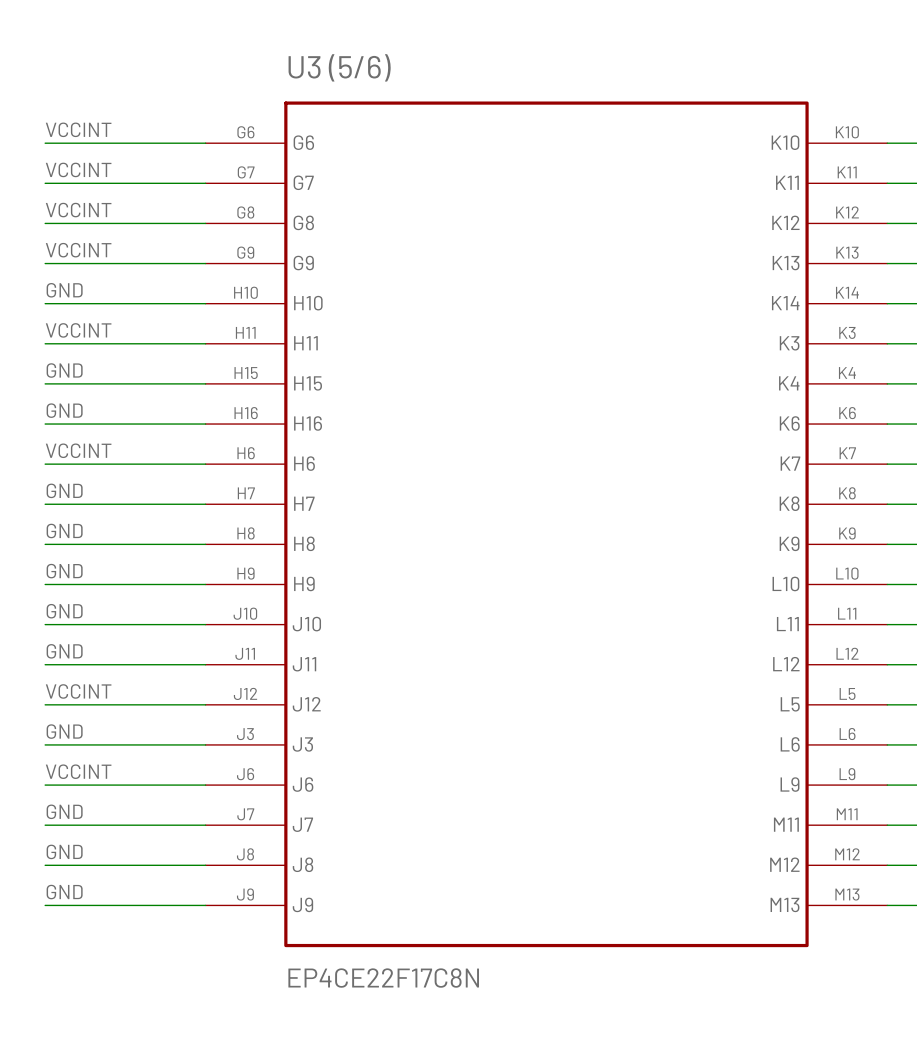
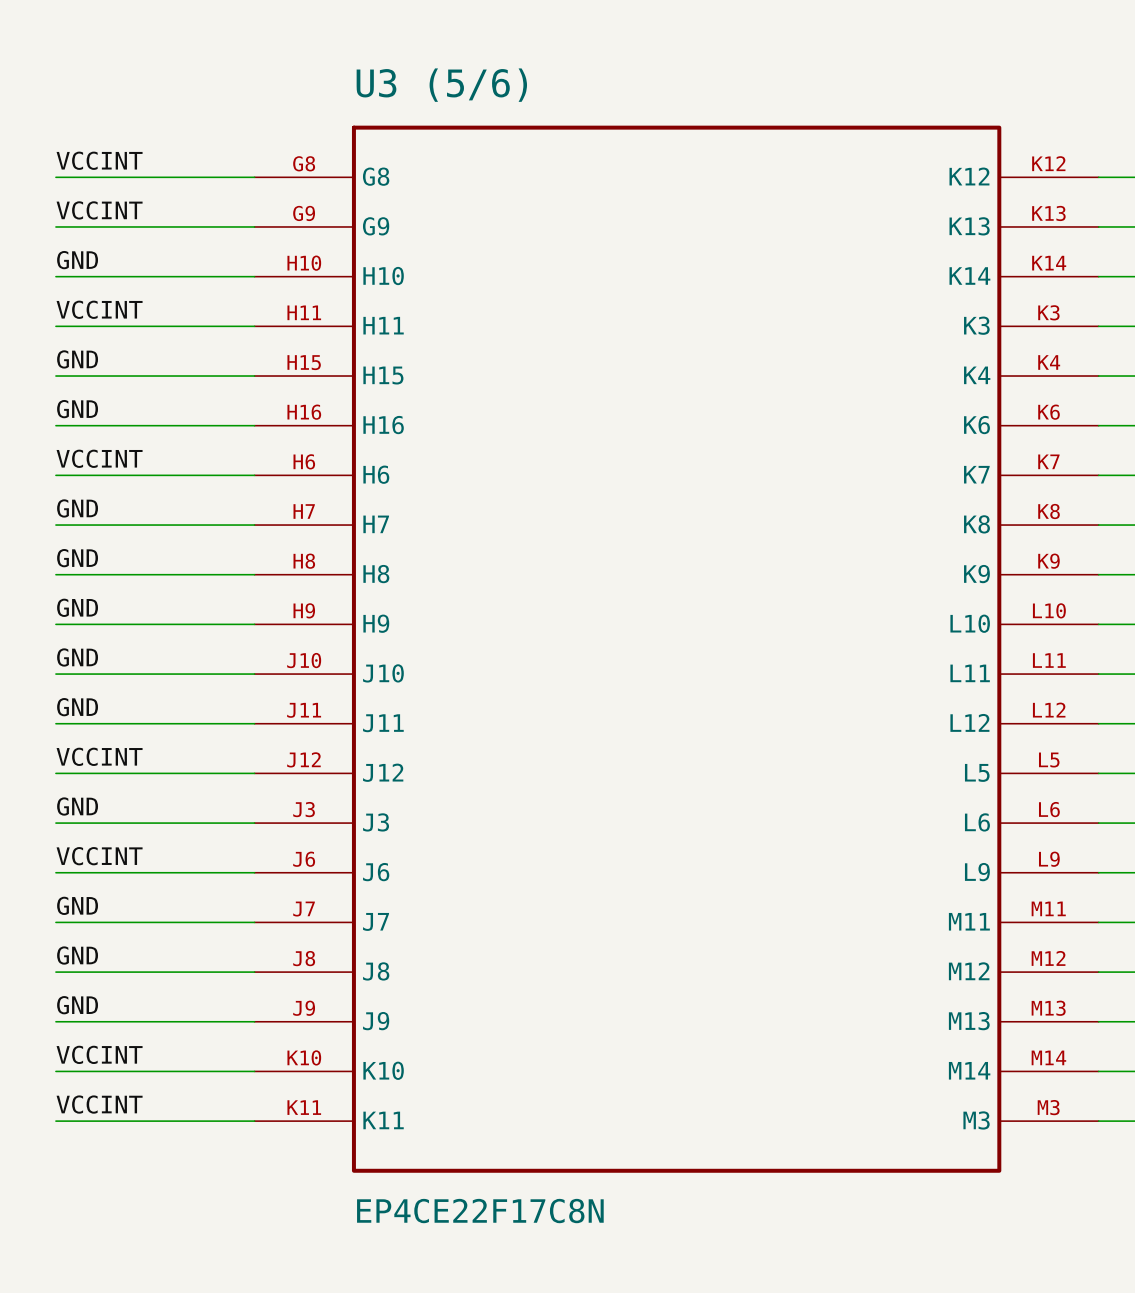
U3 (5/6) symbol: [205, 101, 888, 948] -> [254, 125, 1099, 1173]
label: VCCINT (78, 210) -> GND (77, 260)
label: VCCINT (78, 330) -> GND (77, 409)
label: GND (64, 370) -> VCCINT (99, 458)
label: VCCINT (78, 450) -> GND (77, 558)
label: GND (64, 611) -> VCCINT (99, 756)
label: VCCINT (78, 771) -> GND (77, 955)
label: GND (64, 851) -> VCCINT (99, 1054)
label: GND (64, 892) -> VCCINT (99, 1104)

